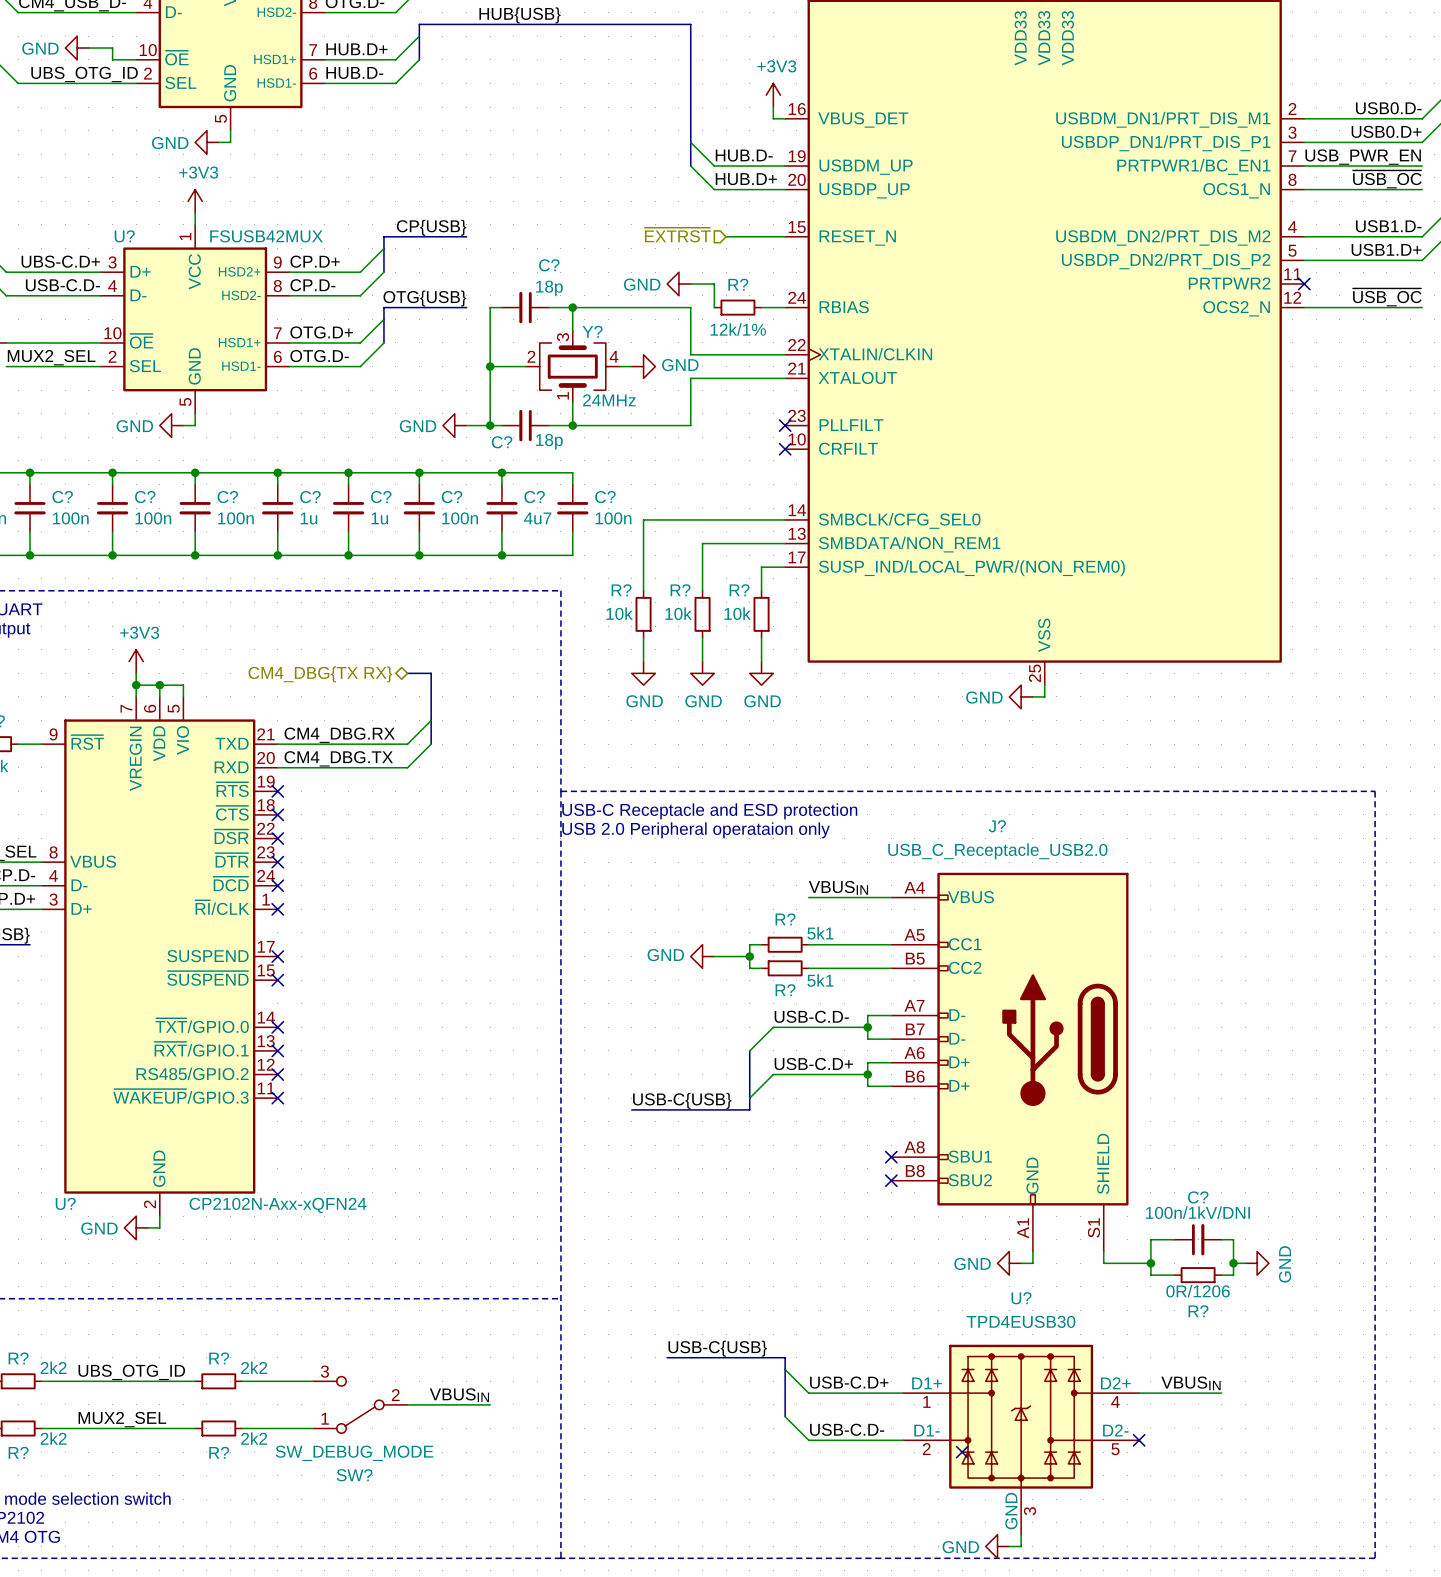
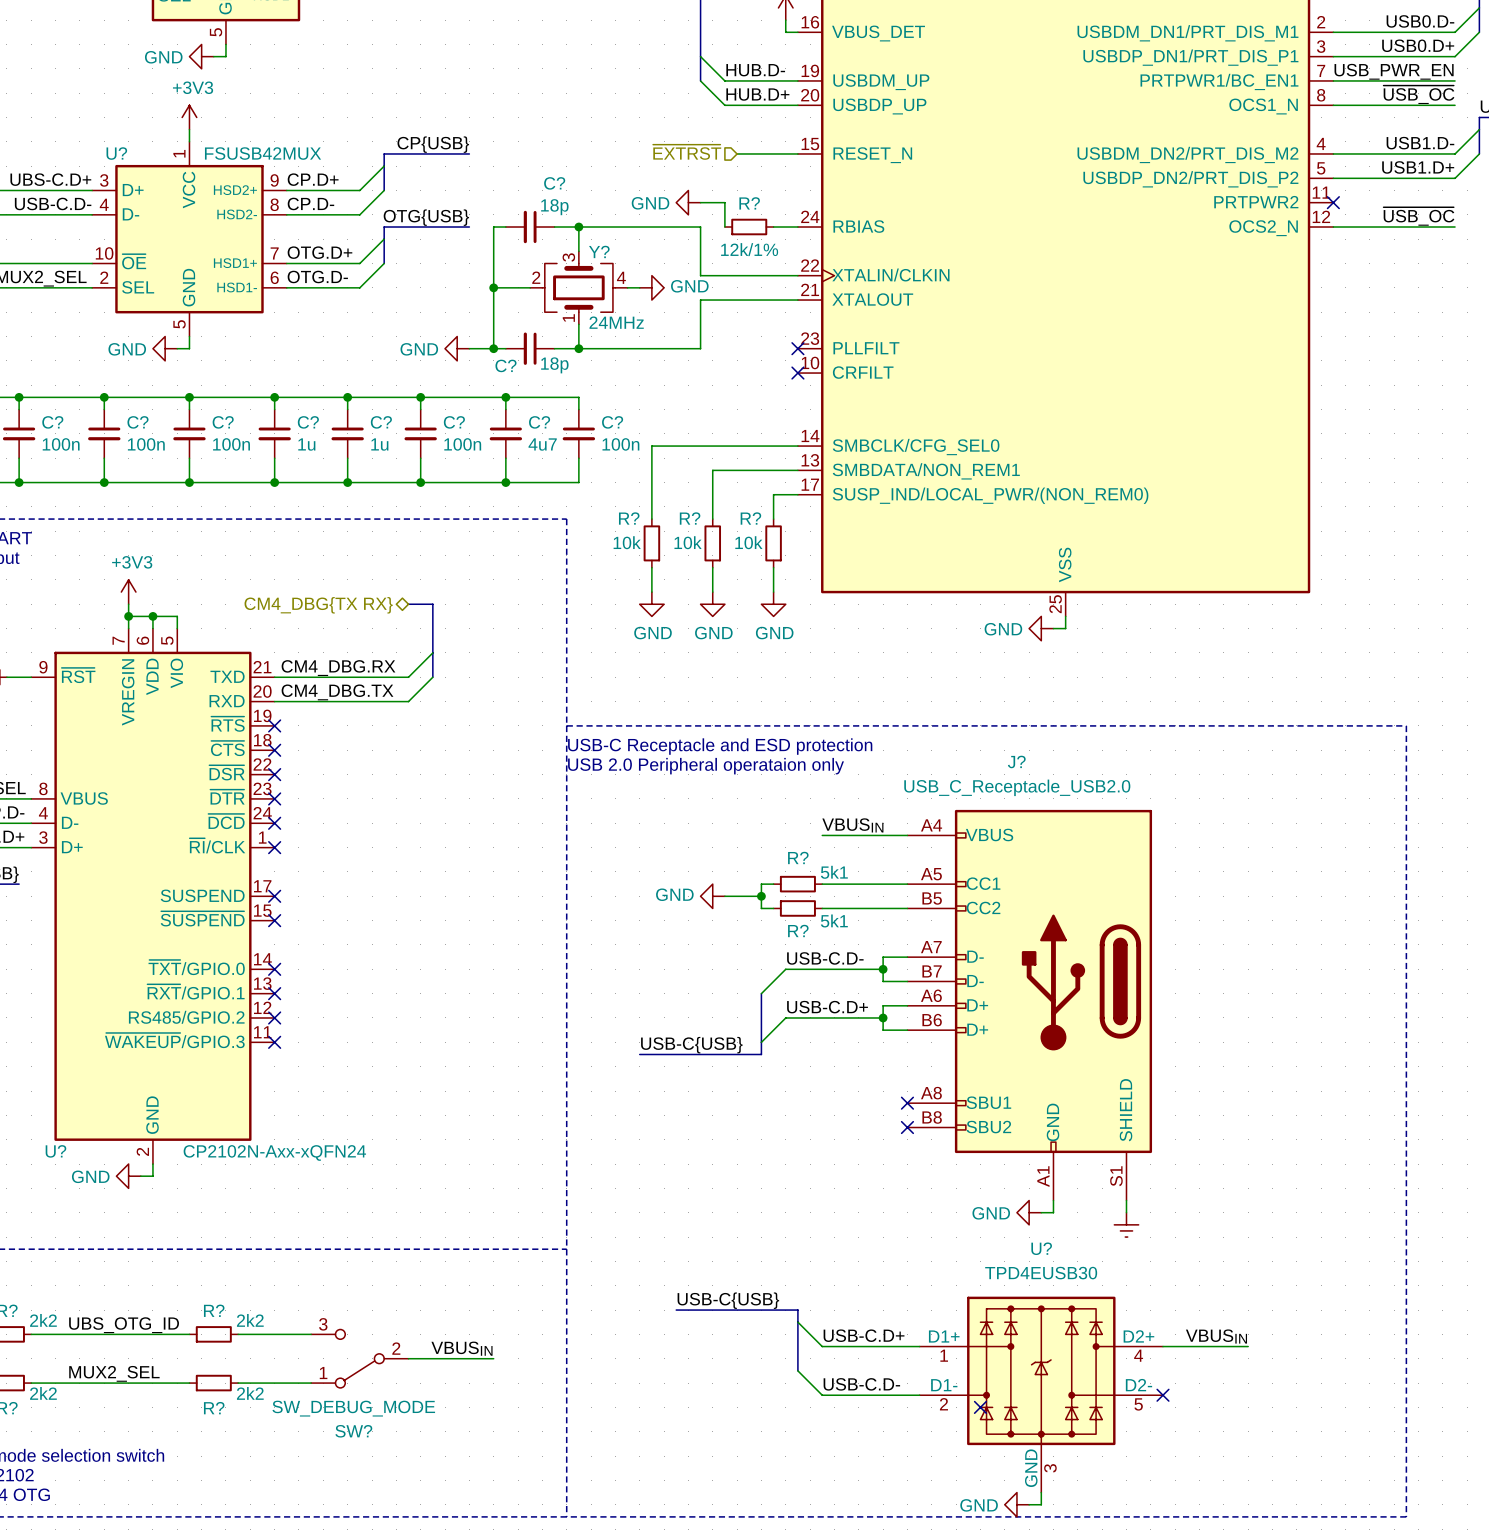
wire: (1174, 1239) (1150, 1239) (1150, 1275) (1174, 1275) -> none
C?: 100n/1kV/DNI (1198, 1239) -> none
wire: (1221, 1239) (1233, 1239) (1233, 1275) (1221, 1275) -> none
wire: (1103, 1263) (1150, 1263) -> none
junction: (1150, 1263) -> none
wire: (1233, 1263) (1245, 1263) -> none
junction: (1233, 1263) -> none
power symbol: GND (1257, 1263) -> none
power symbol: none -> (1126, 1224)
R?: 0R/1206 (1198, 1275) -> none

